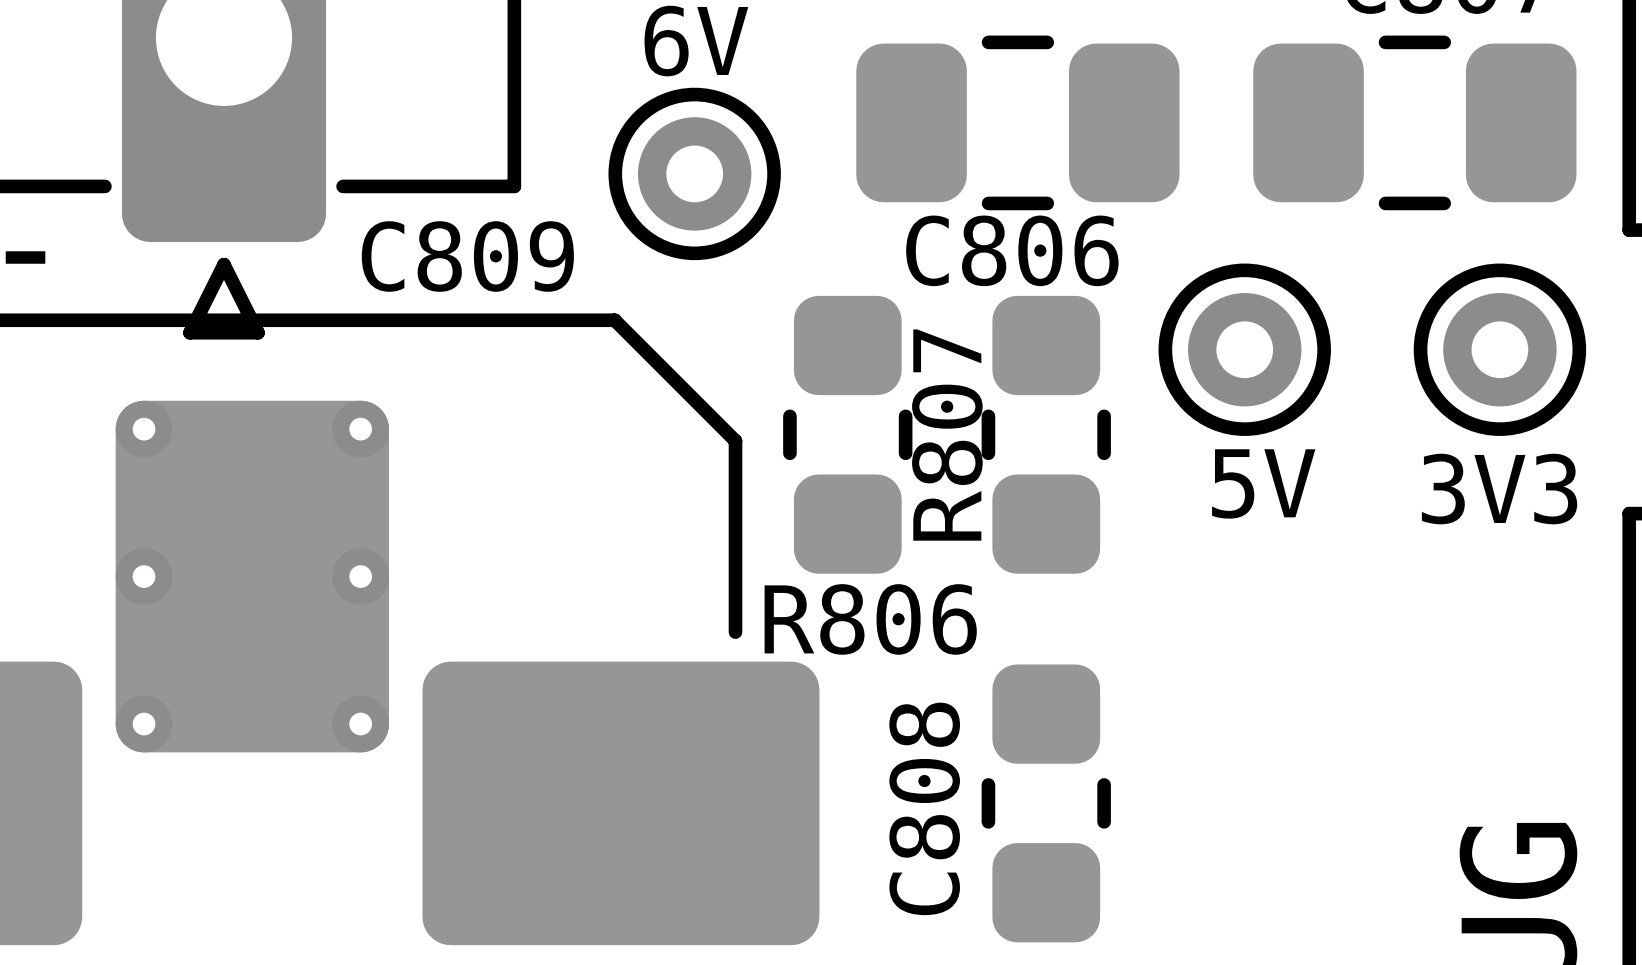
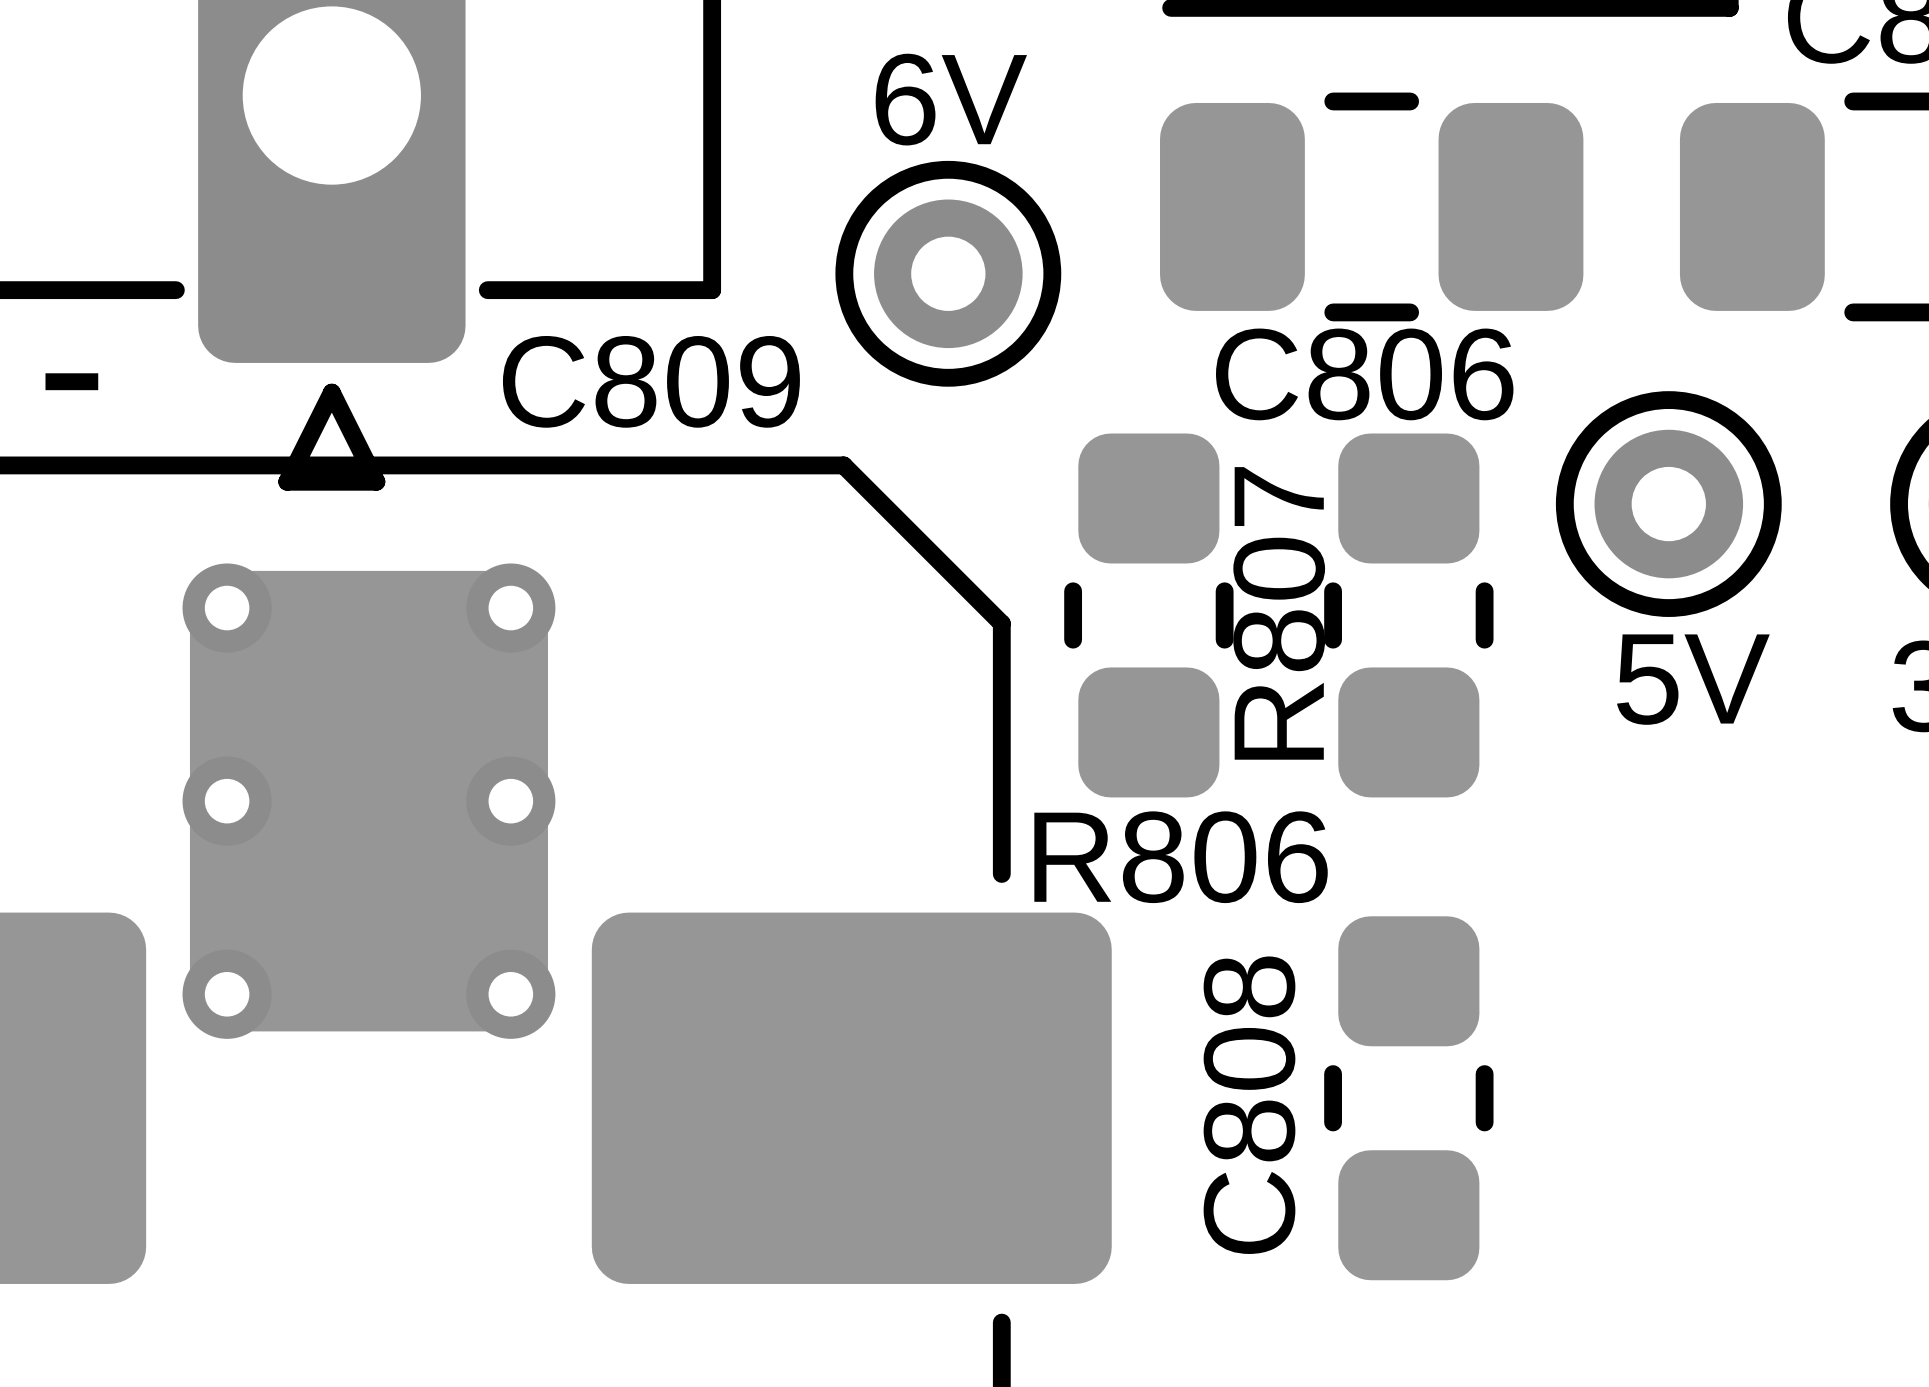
part footprint: [115, 400, 390, 753] -> [182, 563, 556, 1039]

